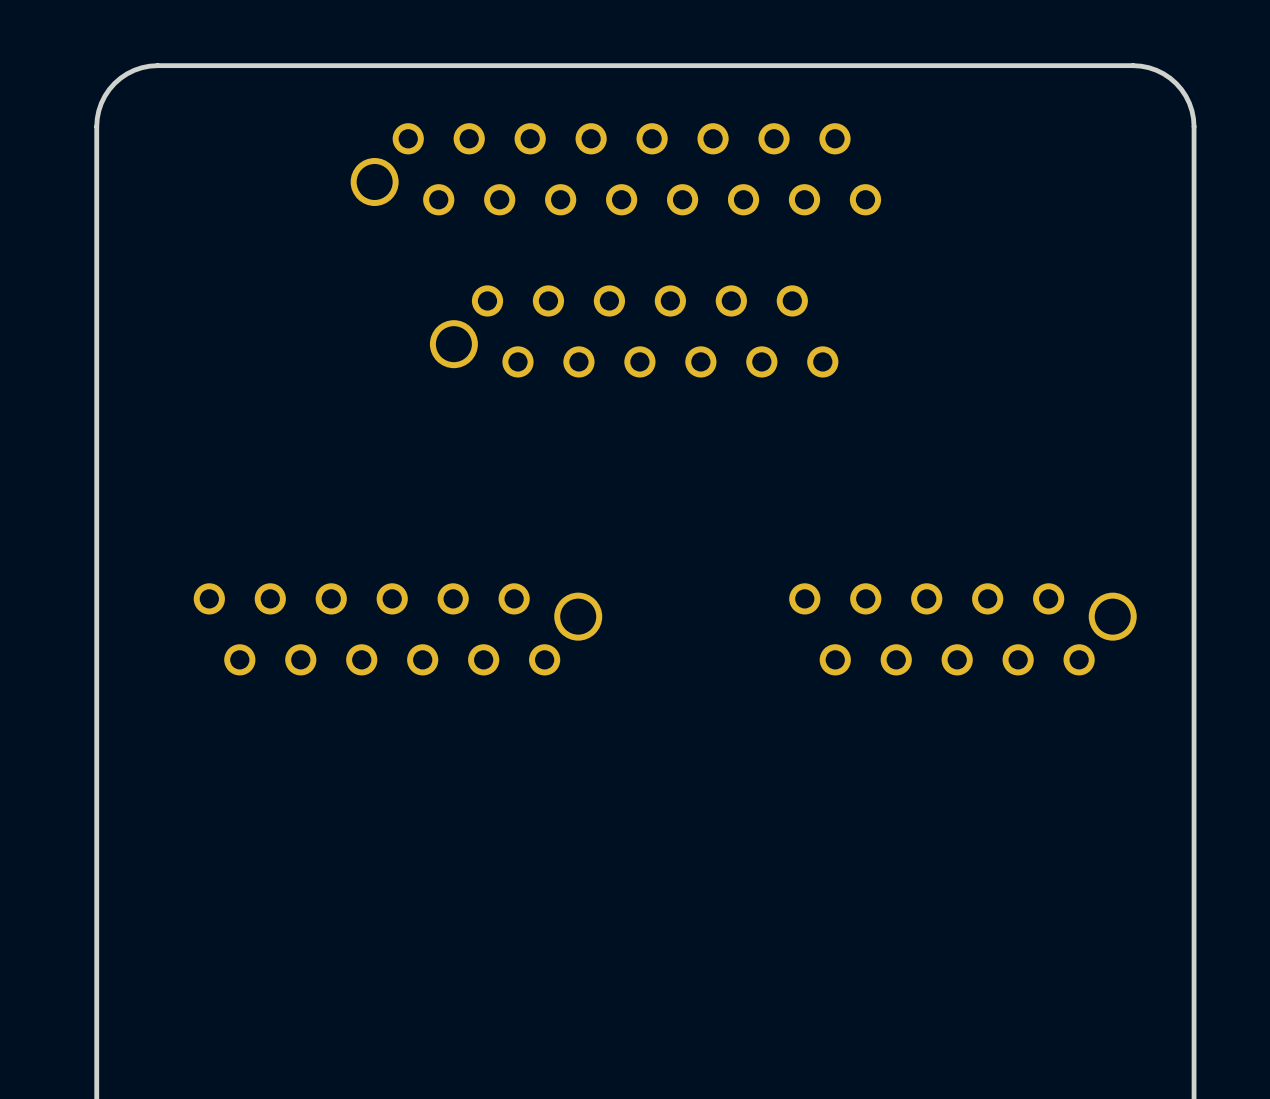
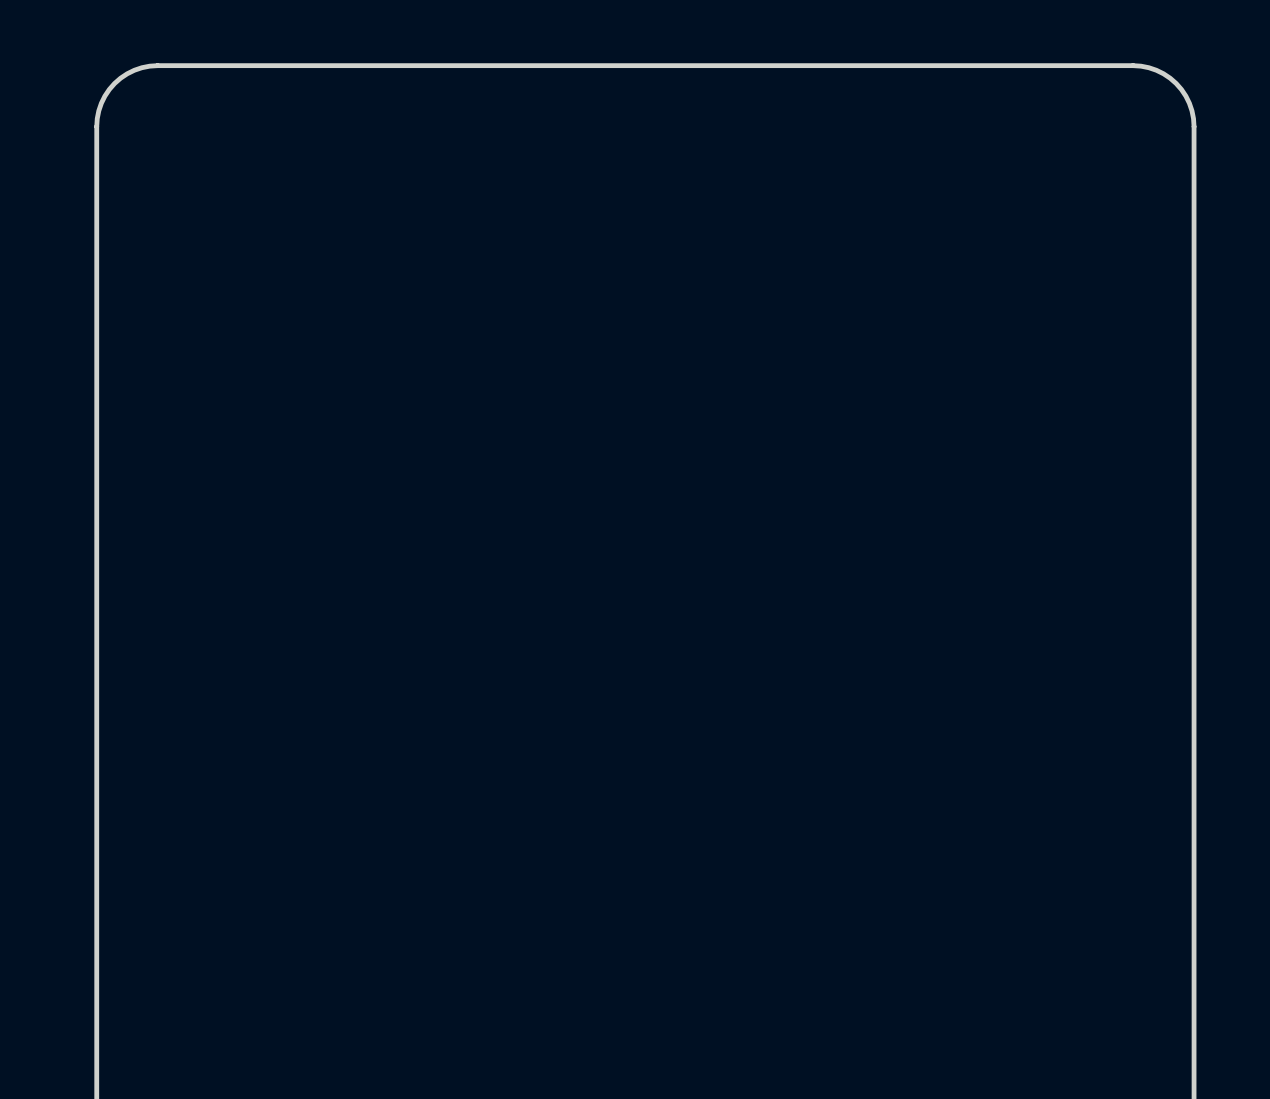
part: (615, 169) -> none
part: (634, 331) -> none
part: (397, 629) -> none
part: (962, 629) -> none

